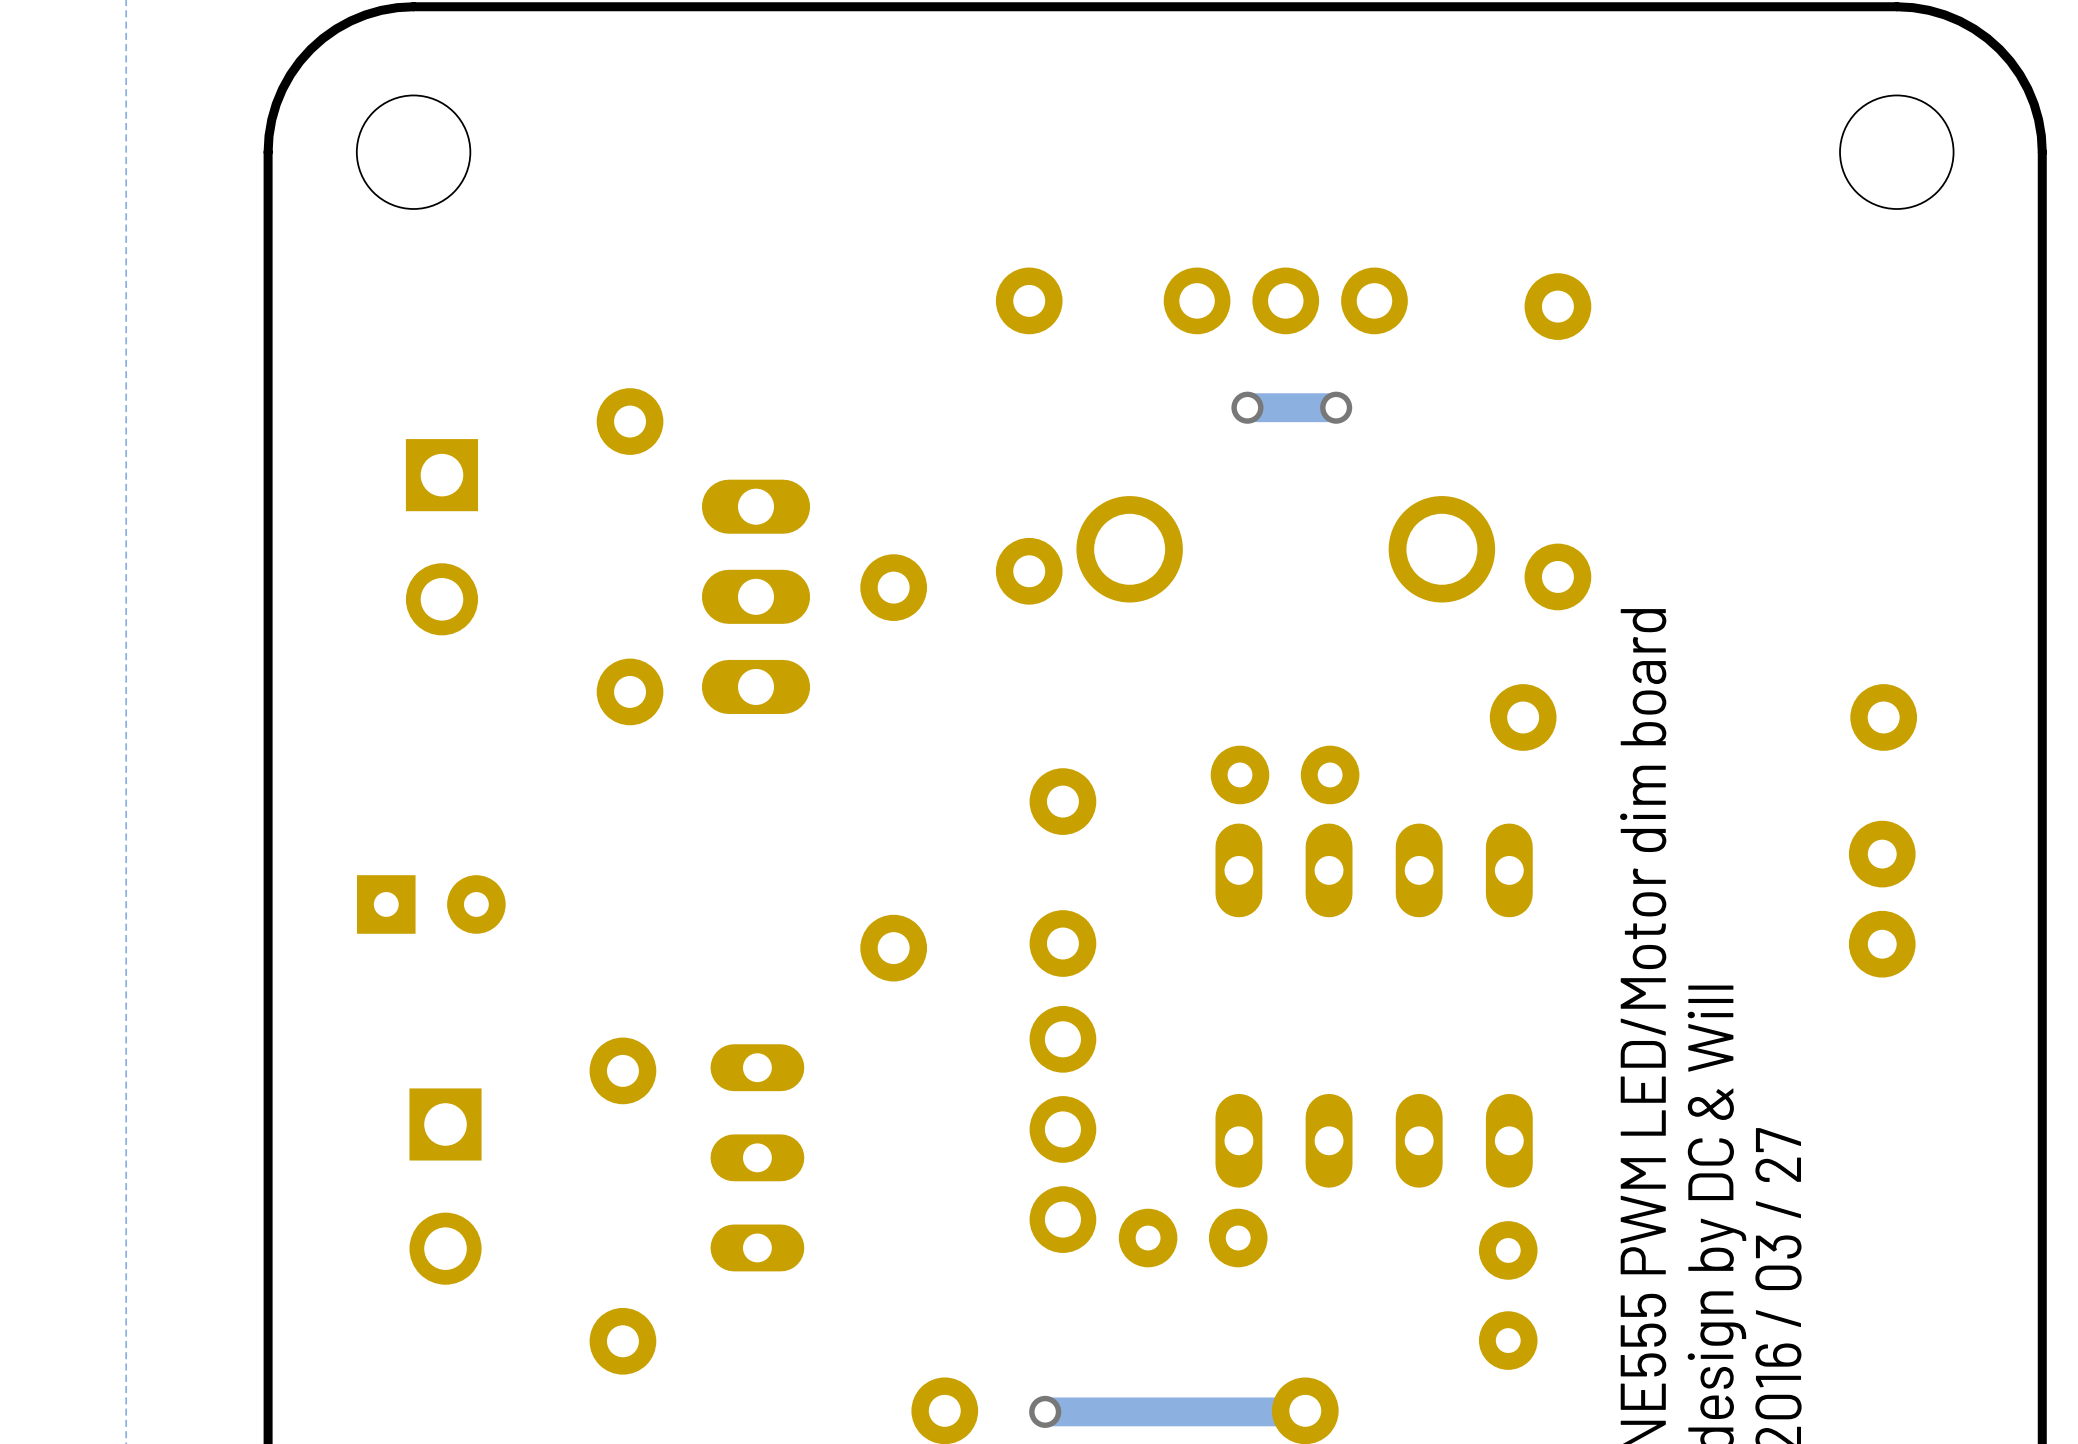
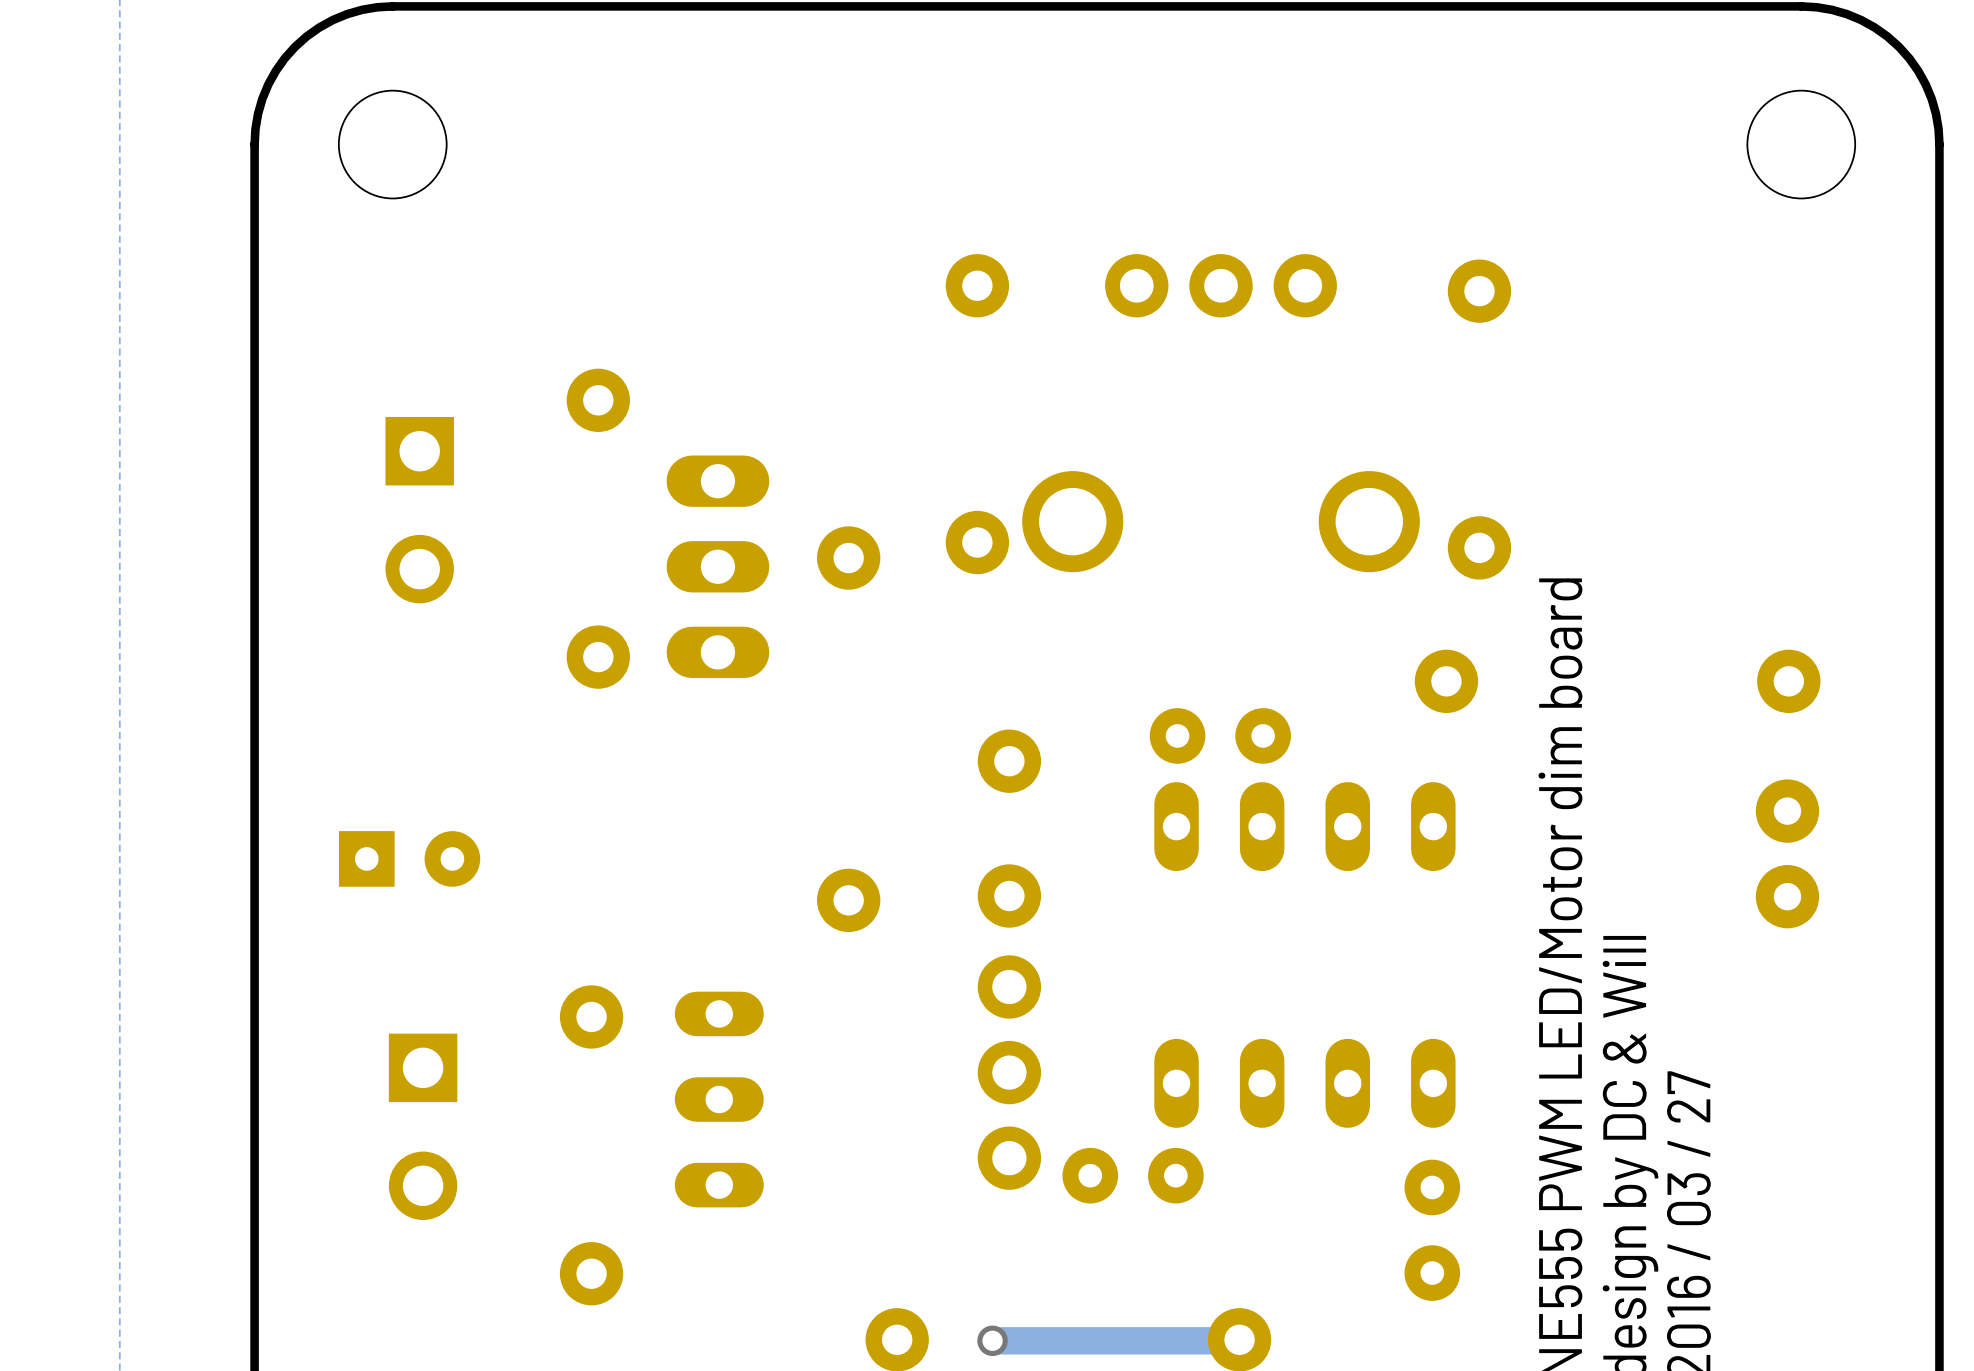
via: (1247, 407) -> none
track: (1336, 407) (1247, 407) -> none
via: (1336, 407) -> none

